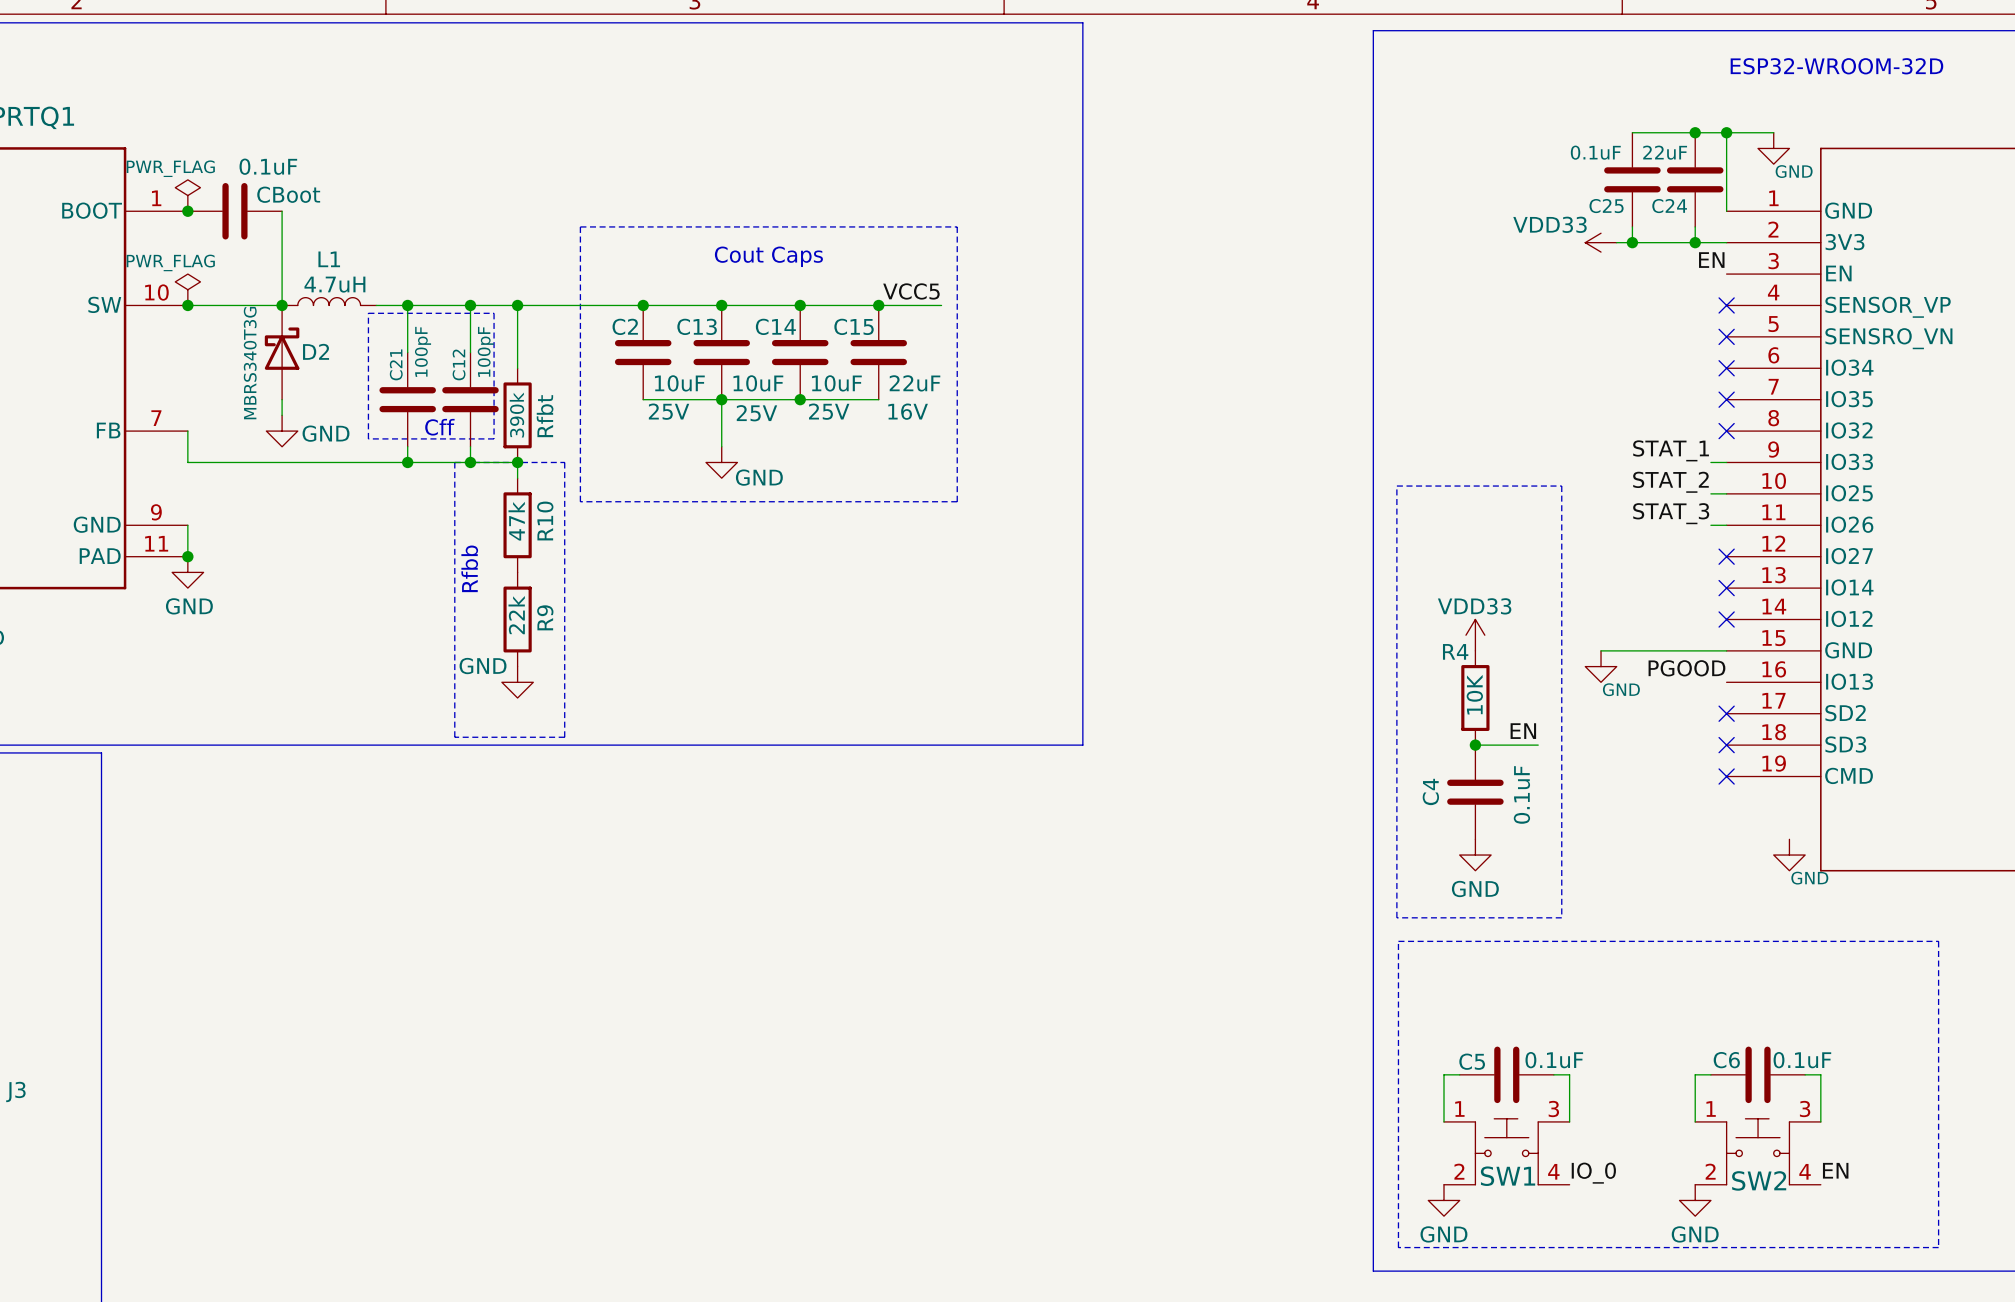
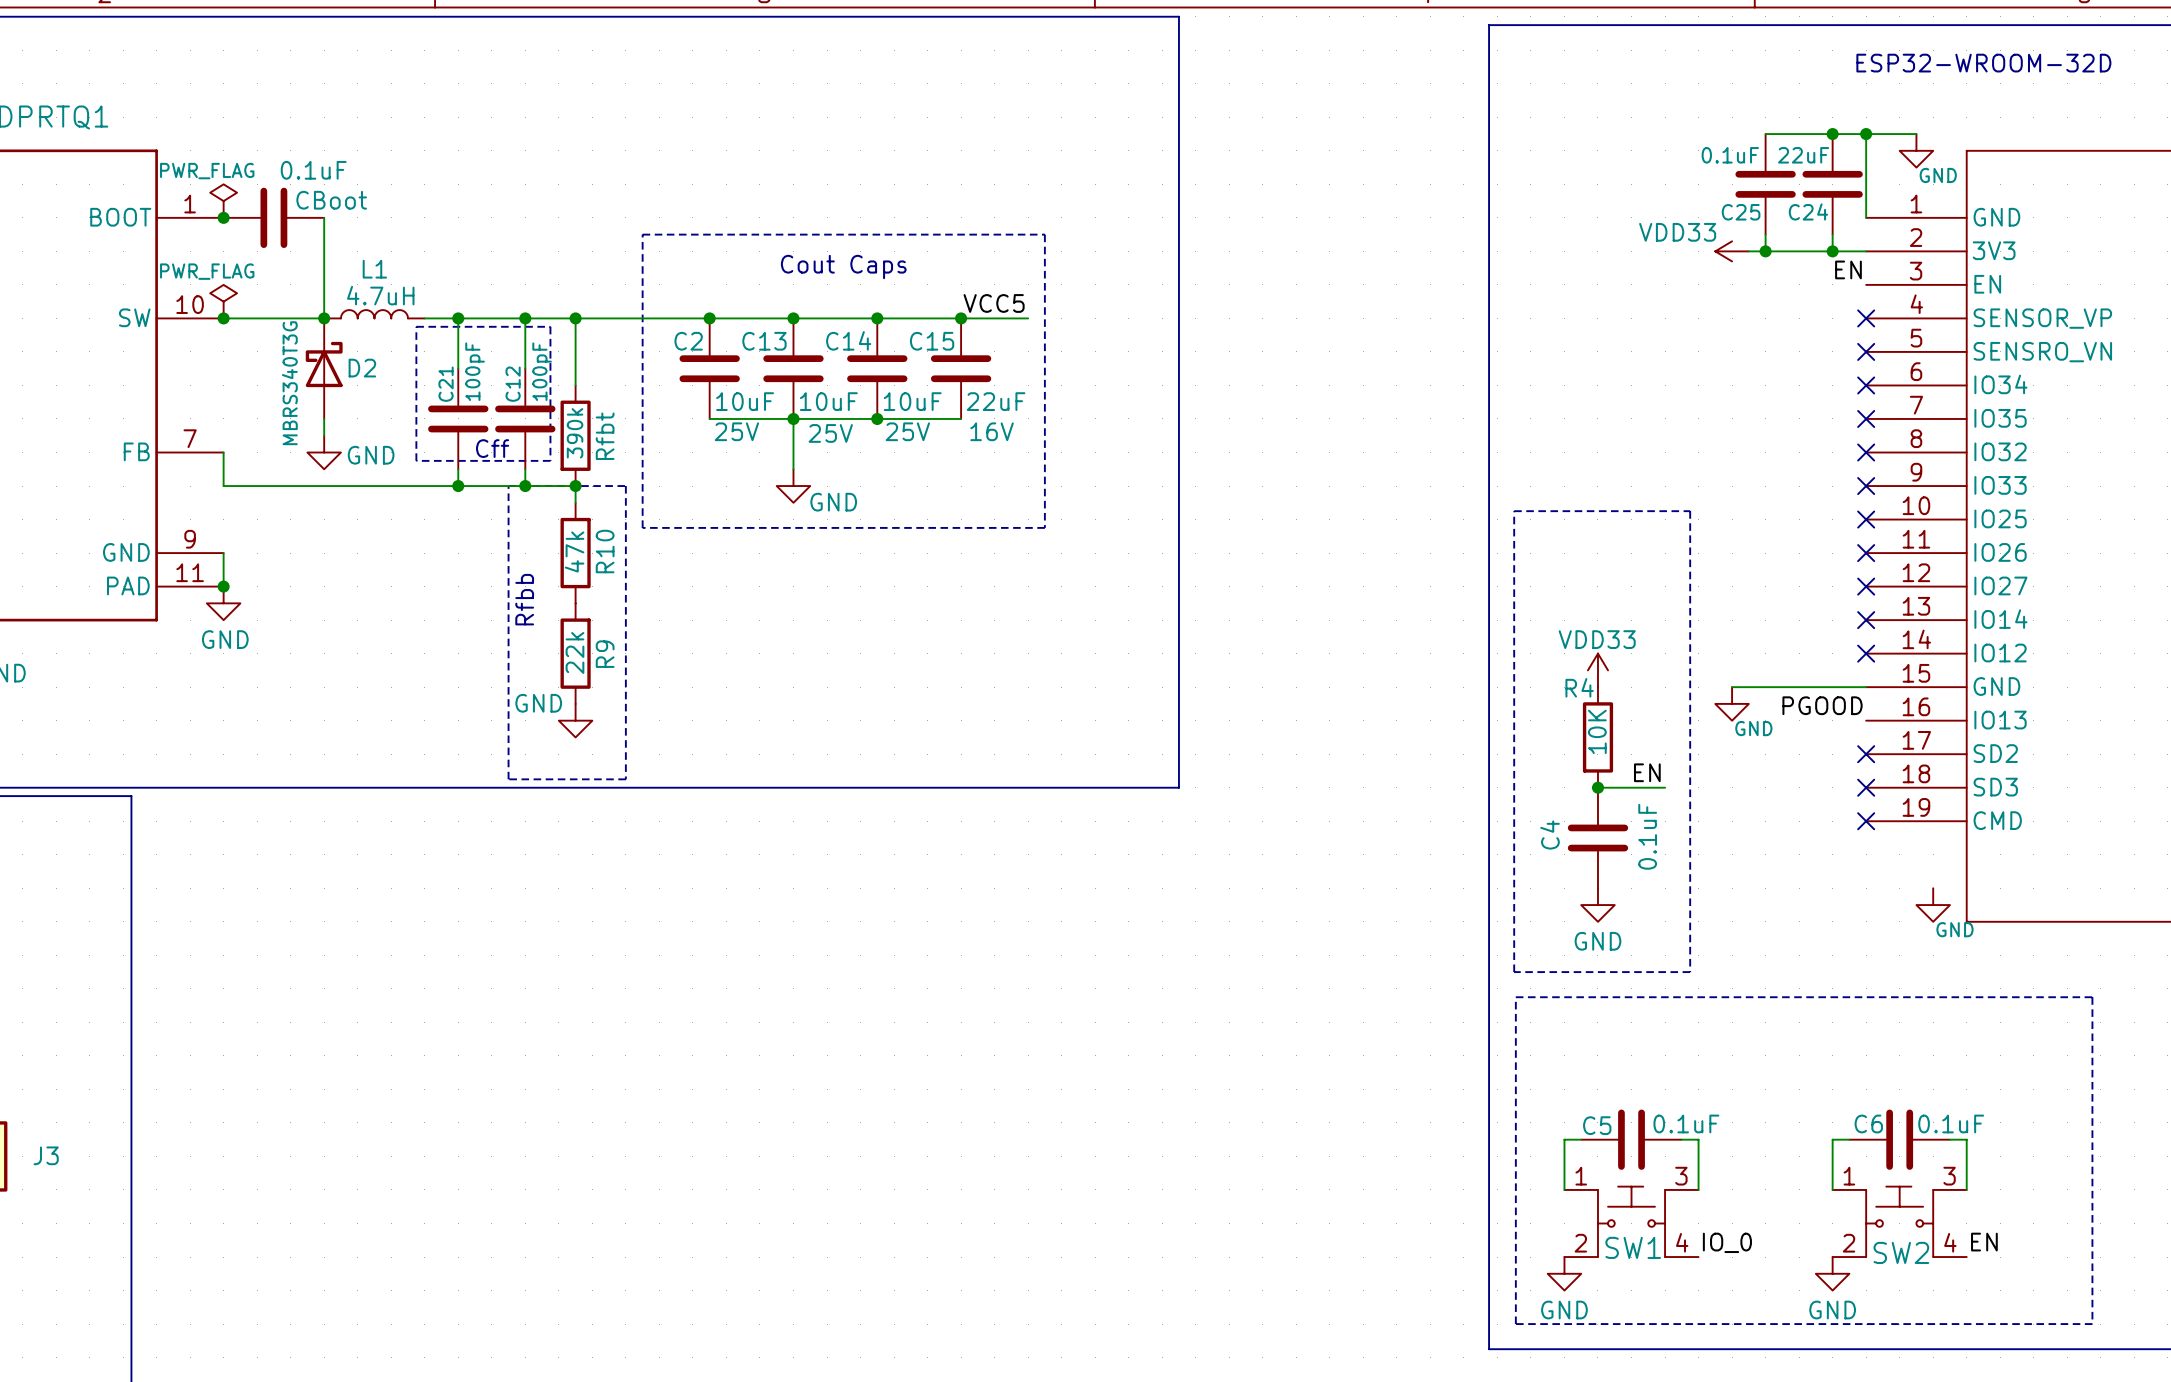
label: STAT_1 (1671, 450) -> none
wire: (1710, 462) (1726, 462) -> none
no-connect mark: none -> (1866, 486)
label: STAT_2 (1670, 482) -> none
wire: (1710, 493) (1726, 493) -> none
no-connect mark: none -> (1866, 519)
label: STAT_3 (1671, 513) -> none
wire: (1710, 525) (1726, 525) -> none
no-connect mark: none -> (1866, 553)

